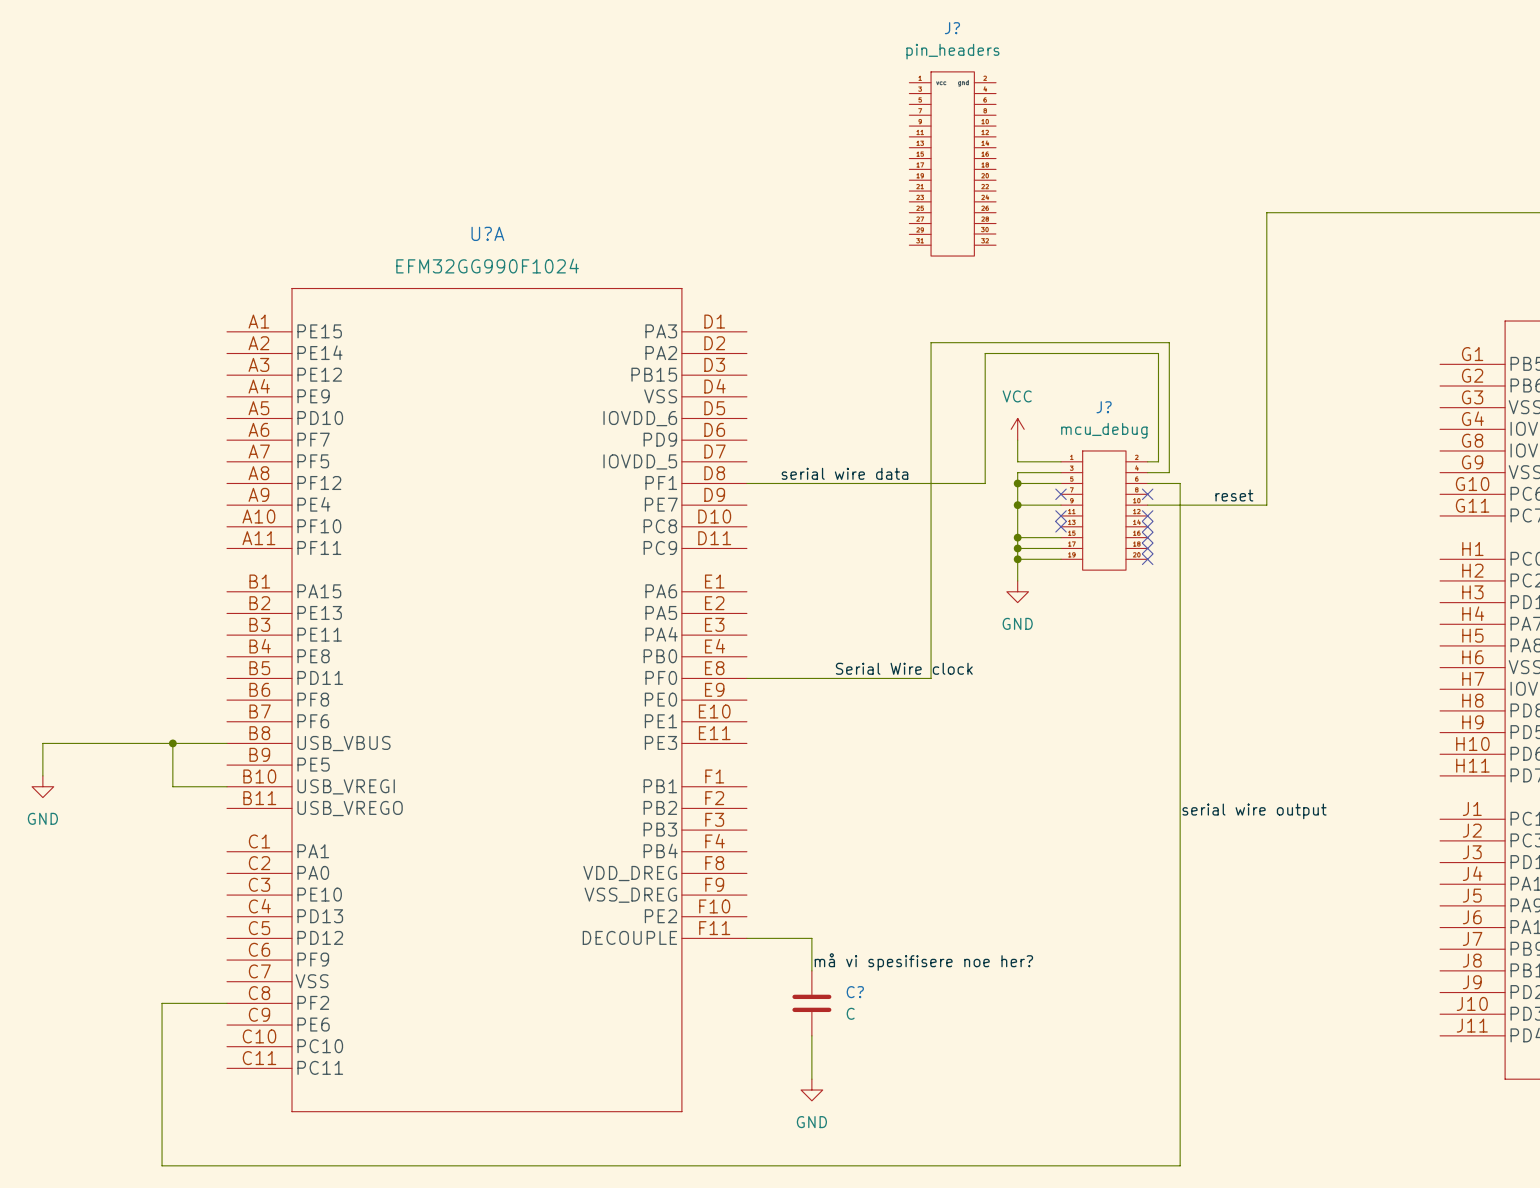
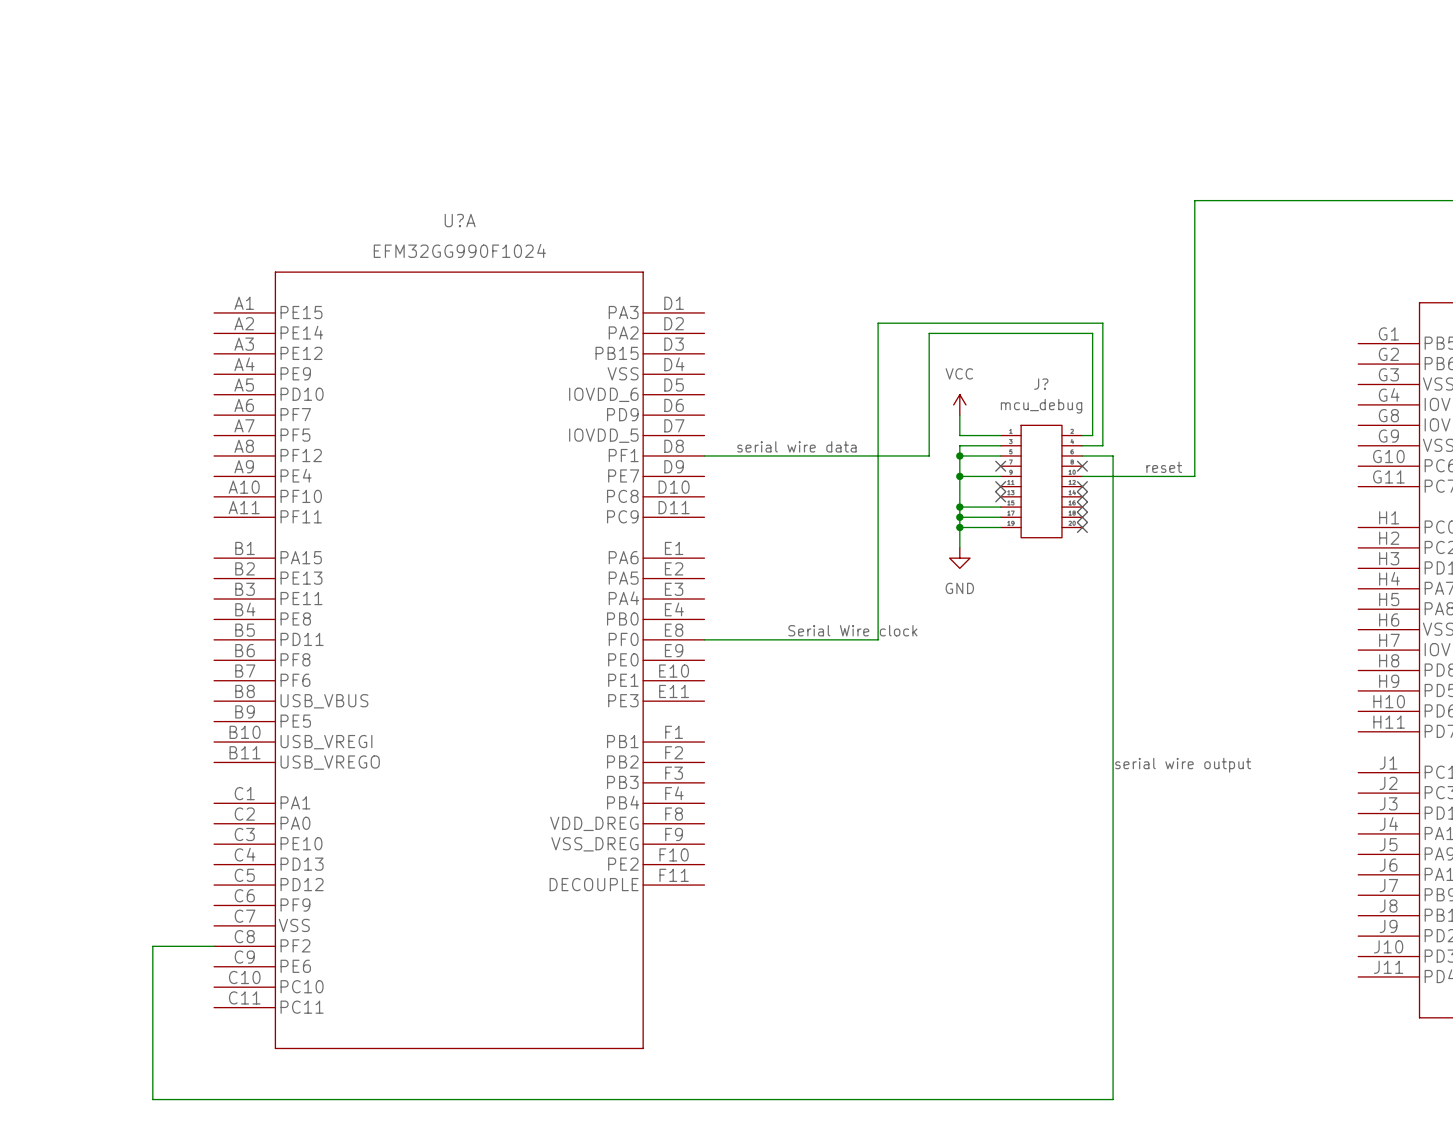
J?: pin_headers (952, 163) -> none
wire: (172, 743) (172, 786) (227, 786) -> none
junction: (172, 743) -> none
wire: (227, 743) (42, 743) (42, 775) -> none
power symbol: GND (42, 786) -> none
wire: (746, 938) (811, 938) (811, 970) -> none
label: må vi spesifisere noe her? (923, 961) -> none
C?: C (811, 1003) -> none
wire: (811, 1035) (811, 1079) -> none
power symbol: GND (811, 1090) -> none

